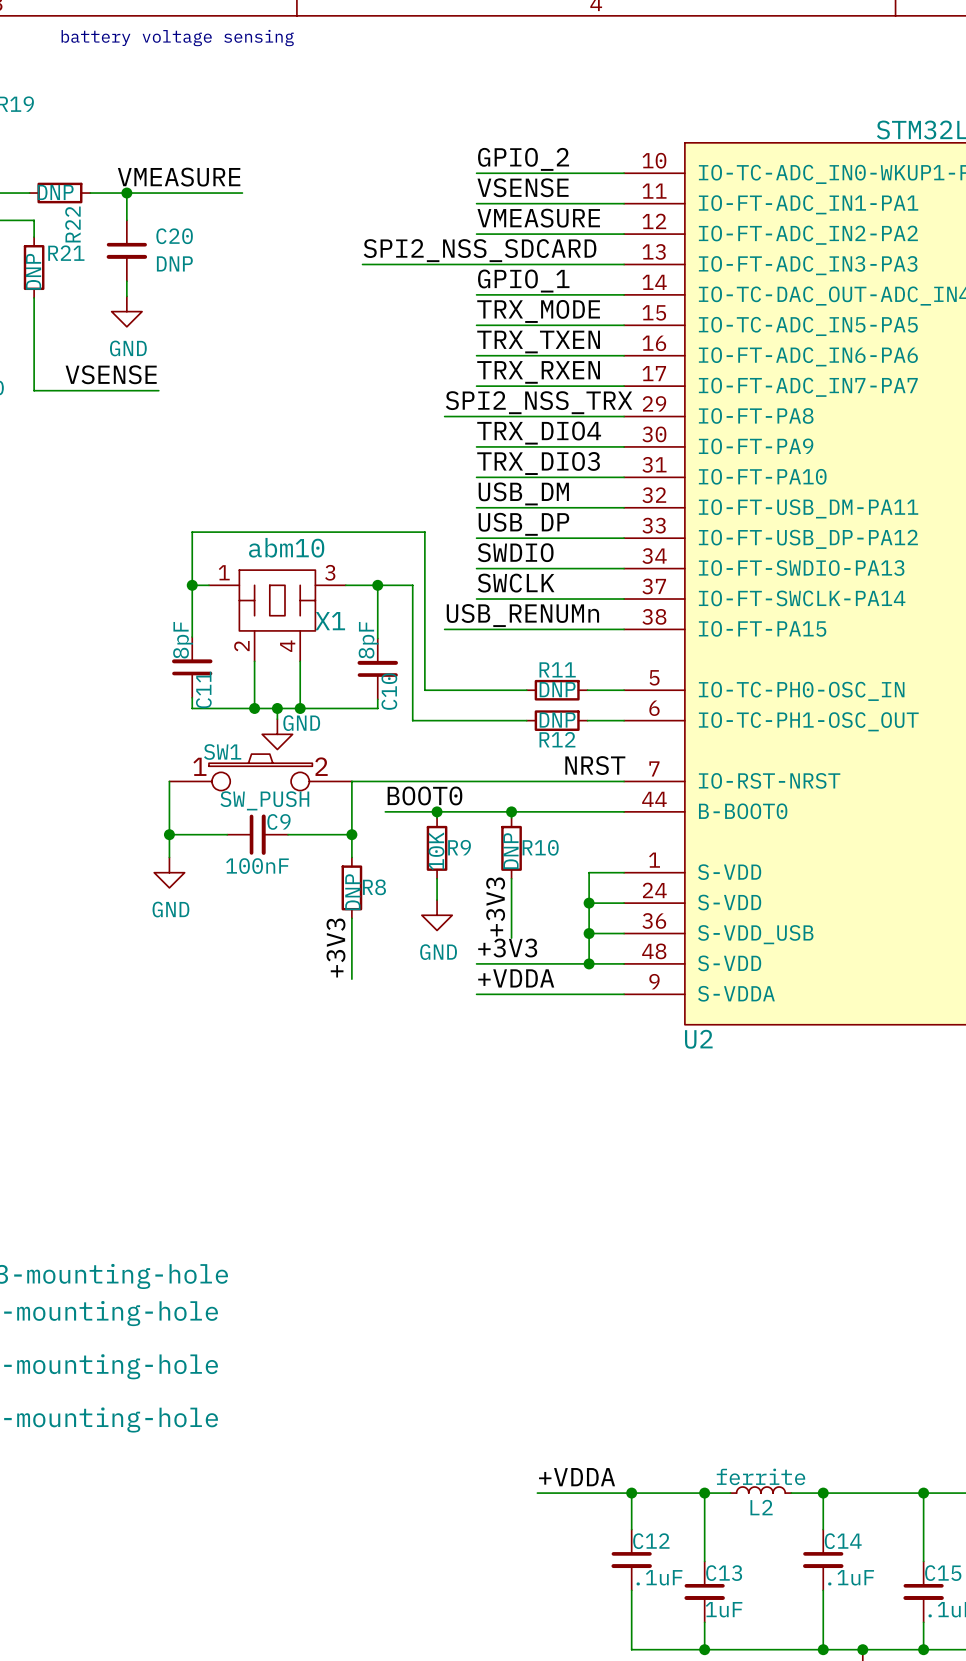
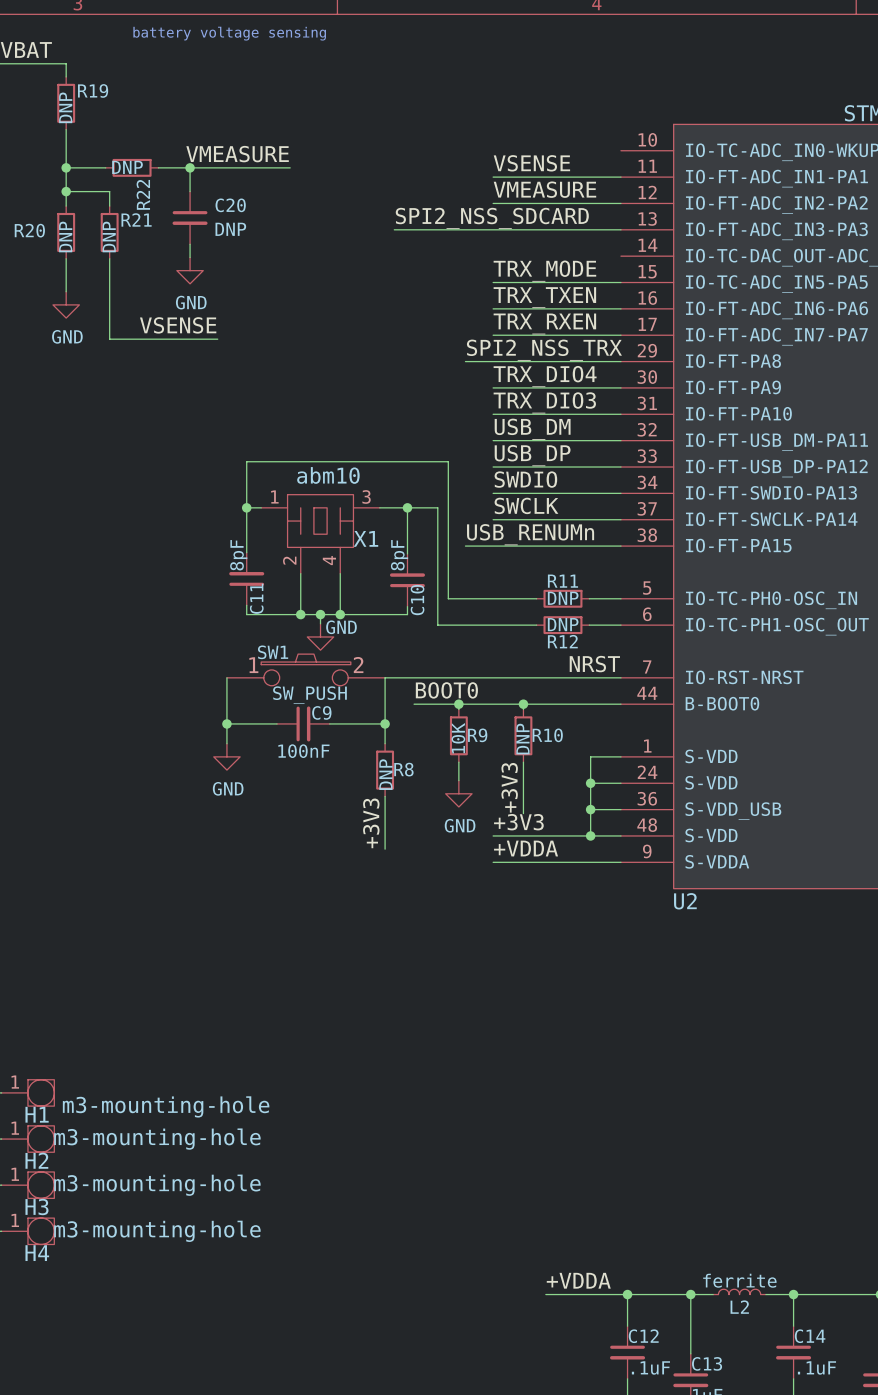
label: GPIO_2 (523, 159) -> none
wire: (476, 173) (624, 173) -> none
label: GPIO_1 (523, 281) -> none
wire: (476, 294) (624, 294) -> none

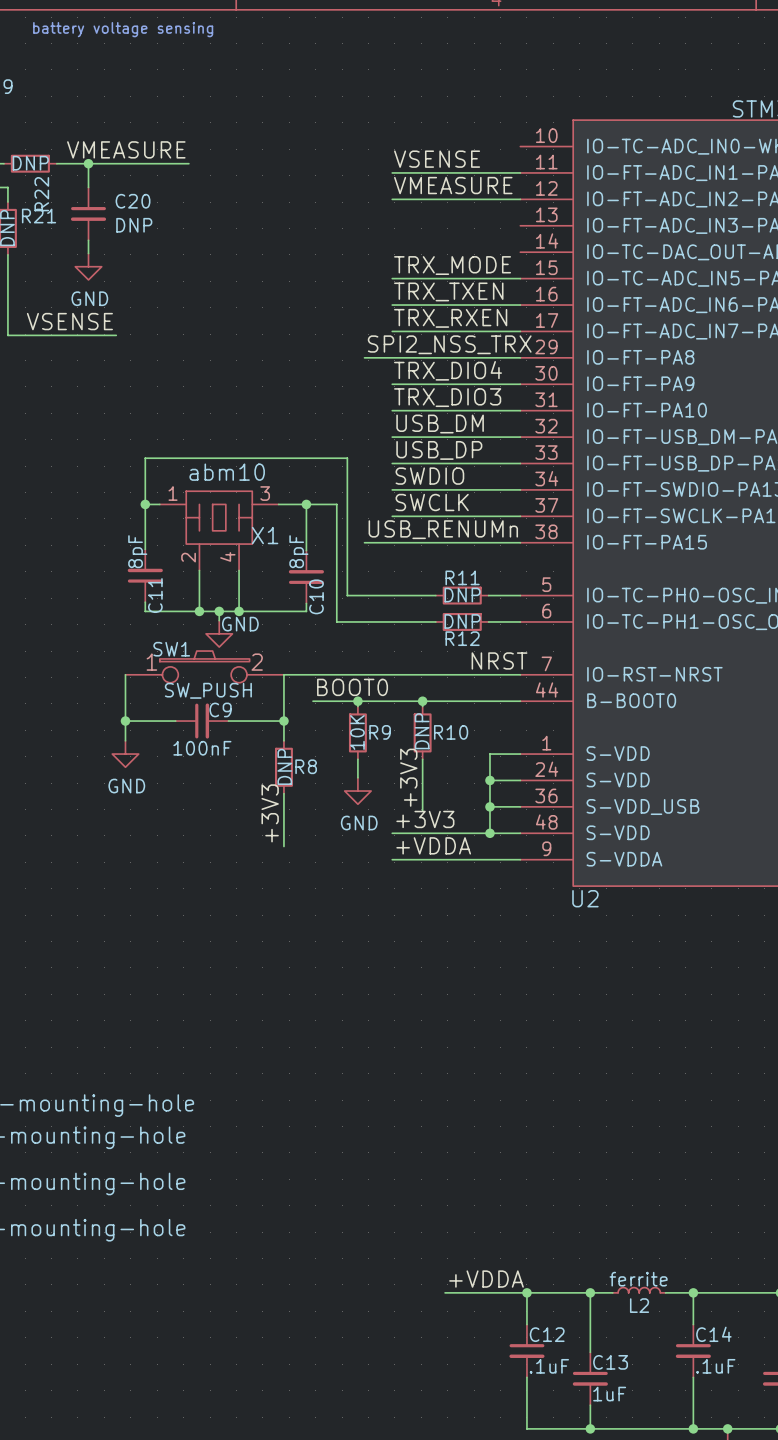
label: SPI2_NSS_SDCARD (492, 218) -> none
wire: (394, 229) (620, 229) -> none

